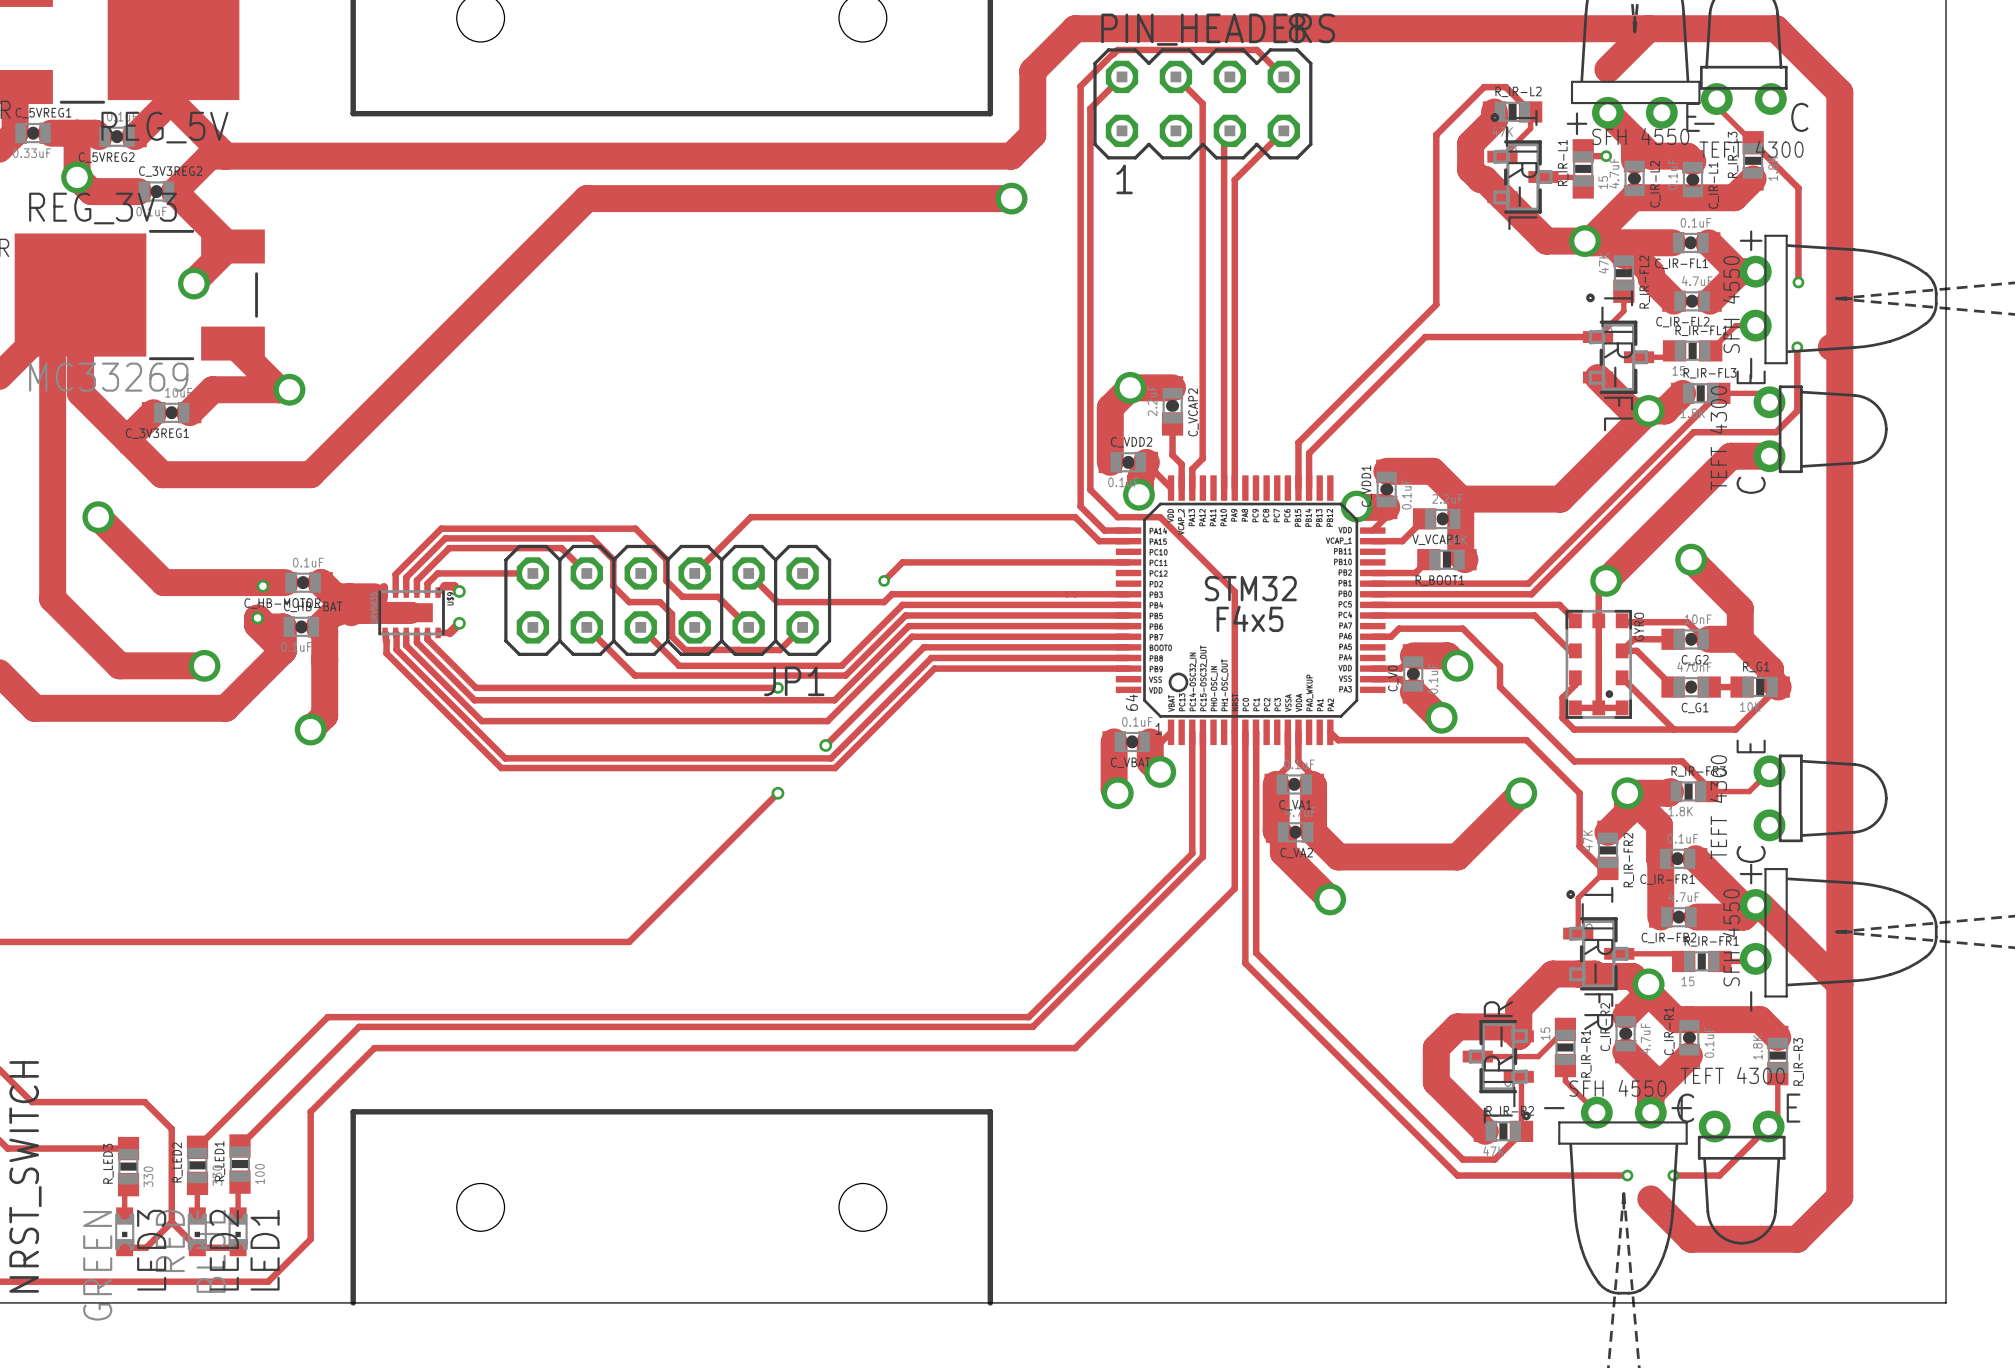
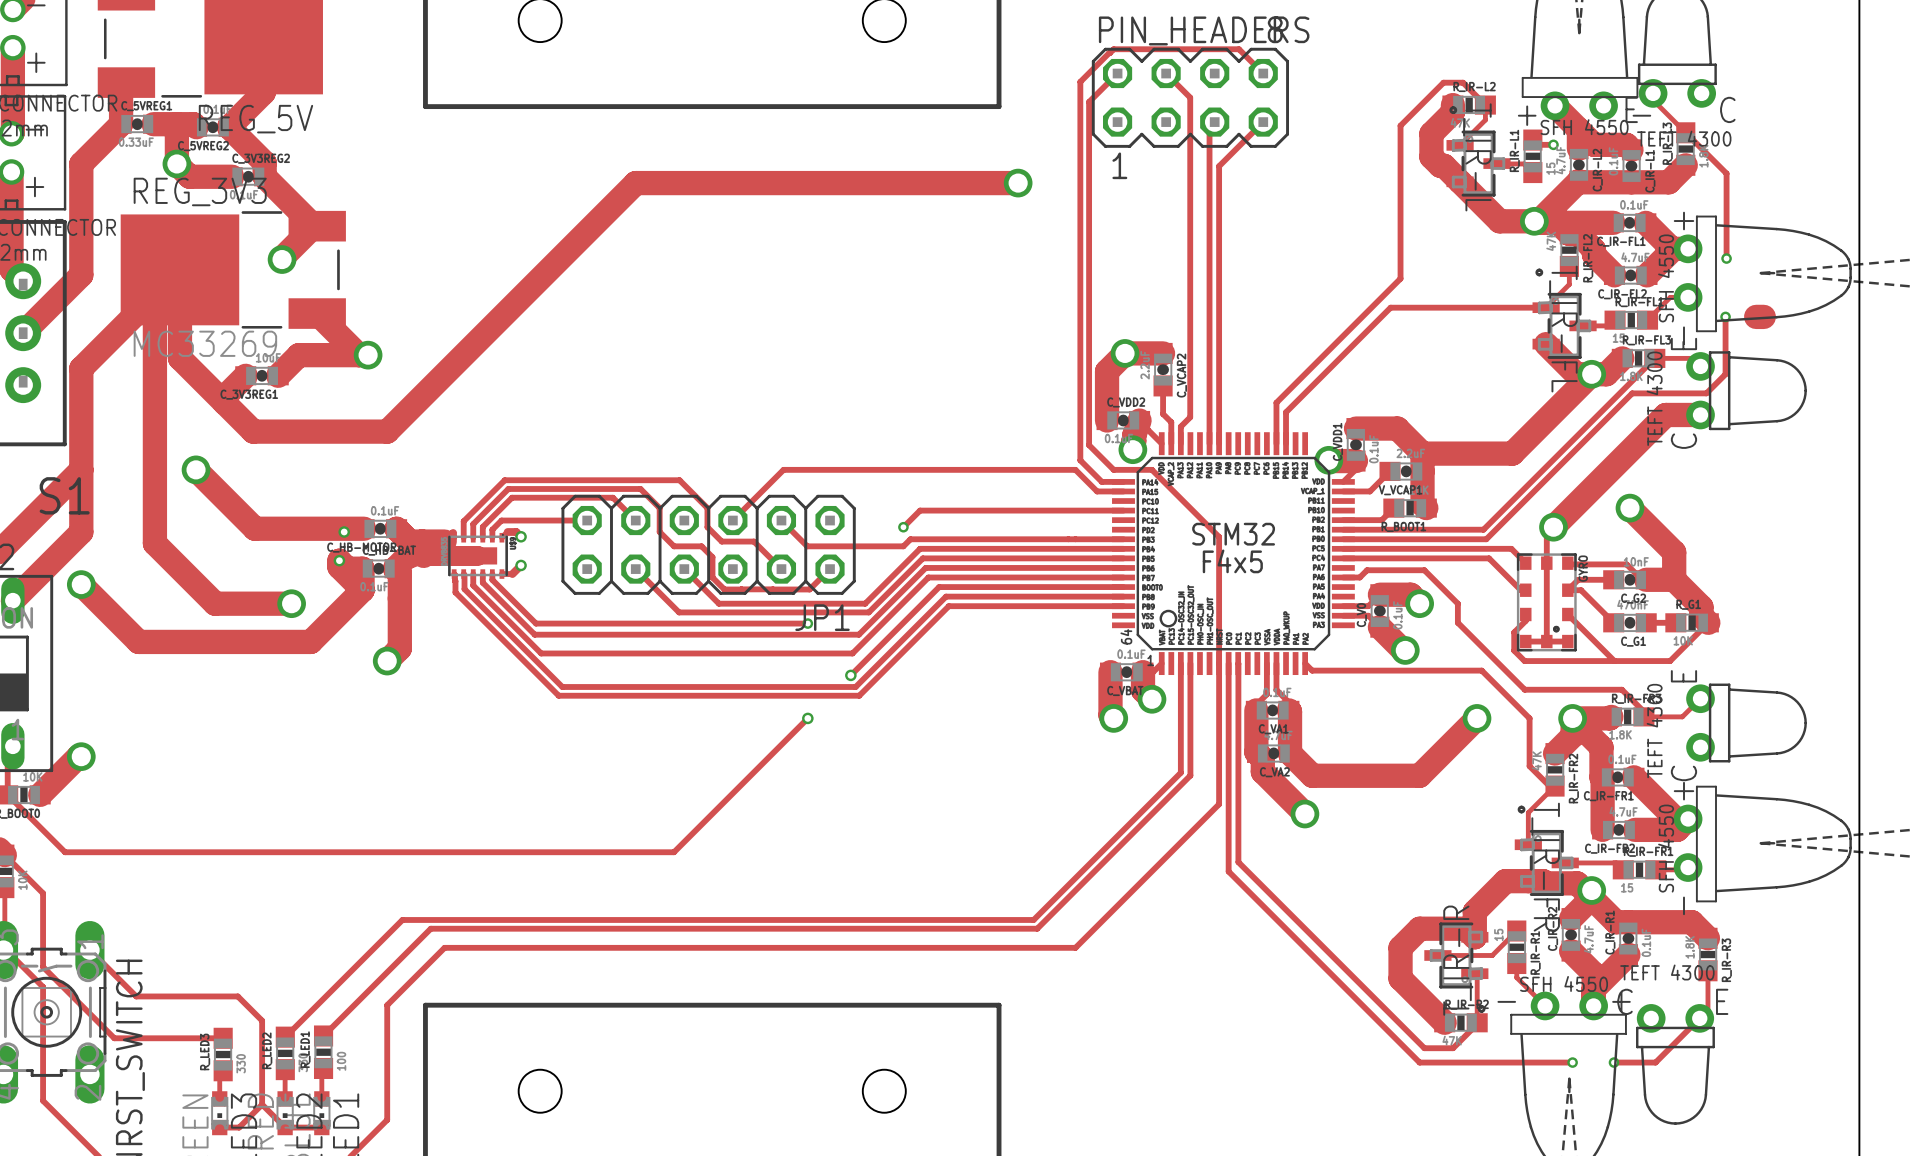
track: (1648, 28) (1607, 69) -> none
track: (173, 98) (173, 103) (225, 156) -> none
track: (174, 191) (210, 156) (1011, 156) (1032, 134) (1032, 71) (1075, 28) (1776, 28) (1839, 92) (1839, 1196) (1797, 1239) (1691, 1239) (1650, 1198) -> (264, 176) (264, 162) (229, 127)
track: (1760, 904) (1839, 984) -> none

